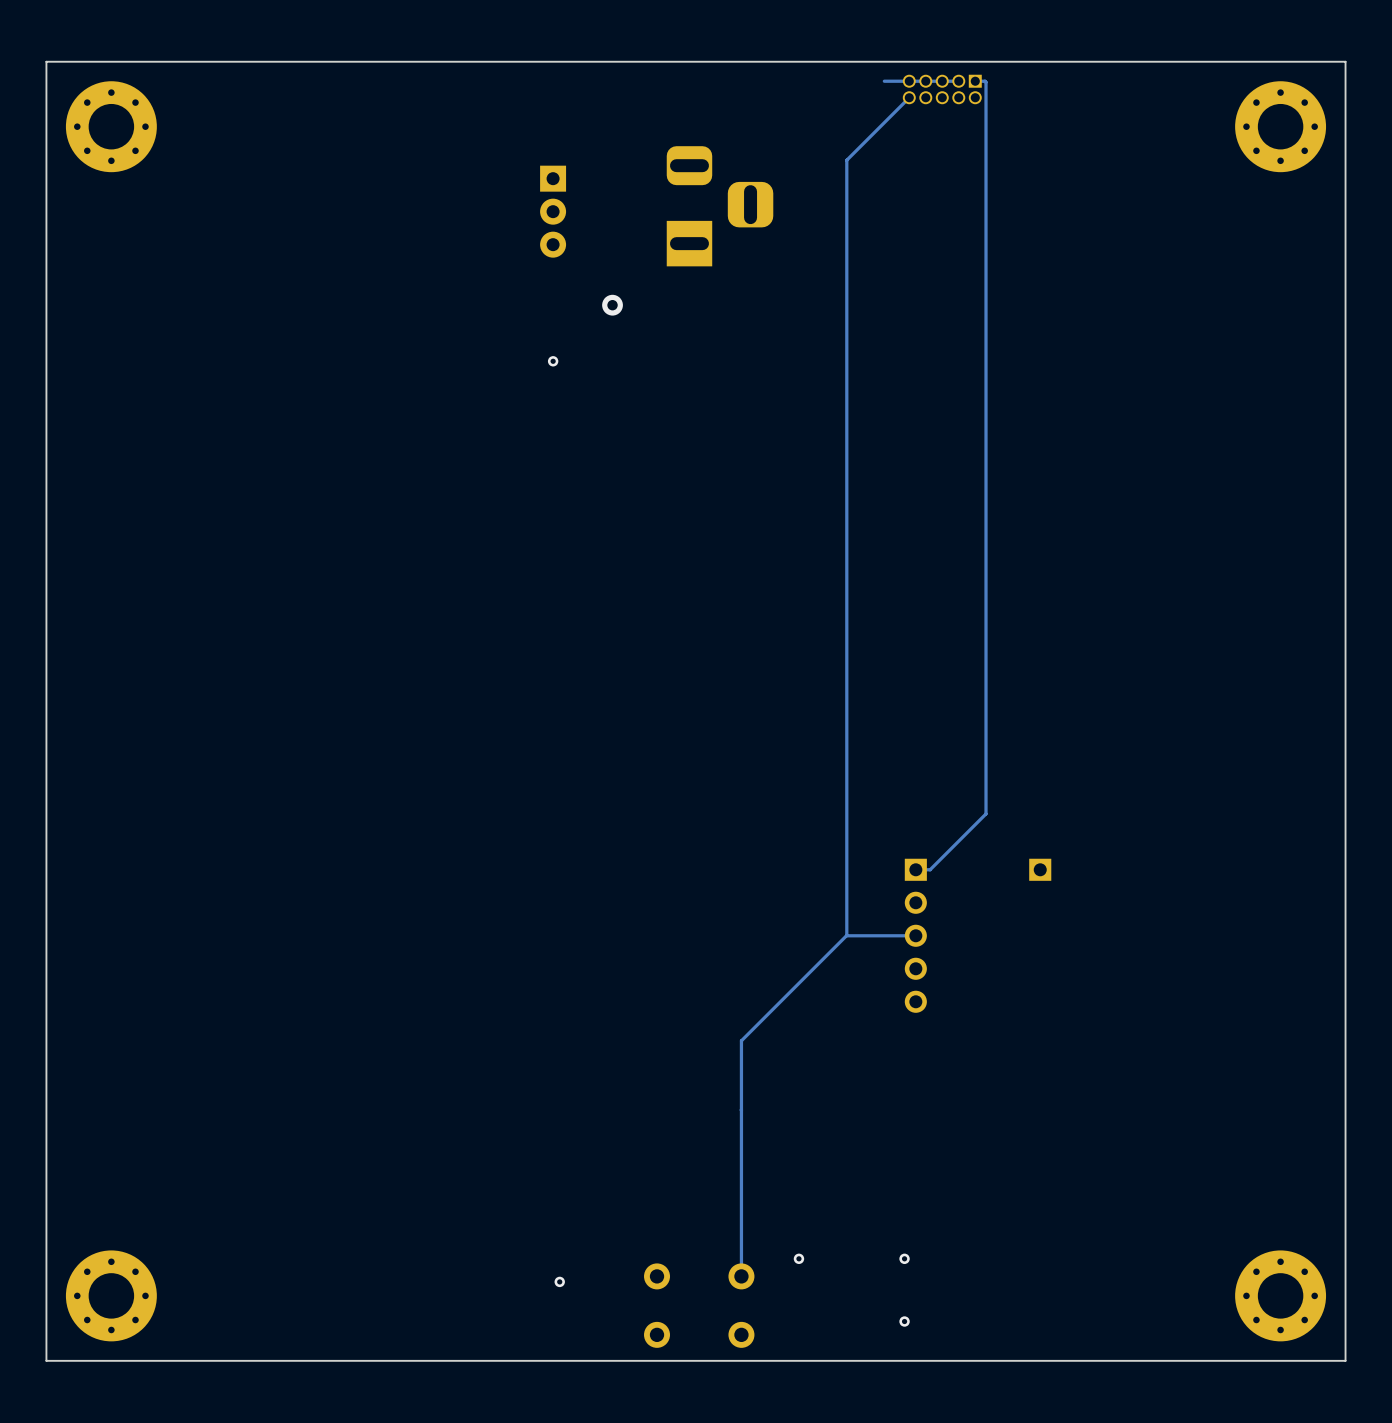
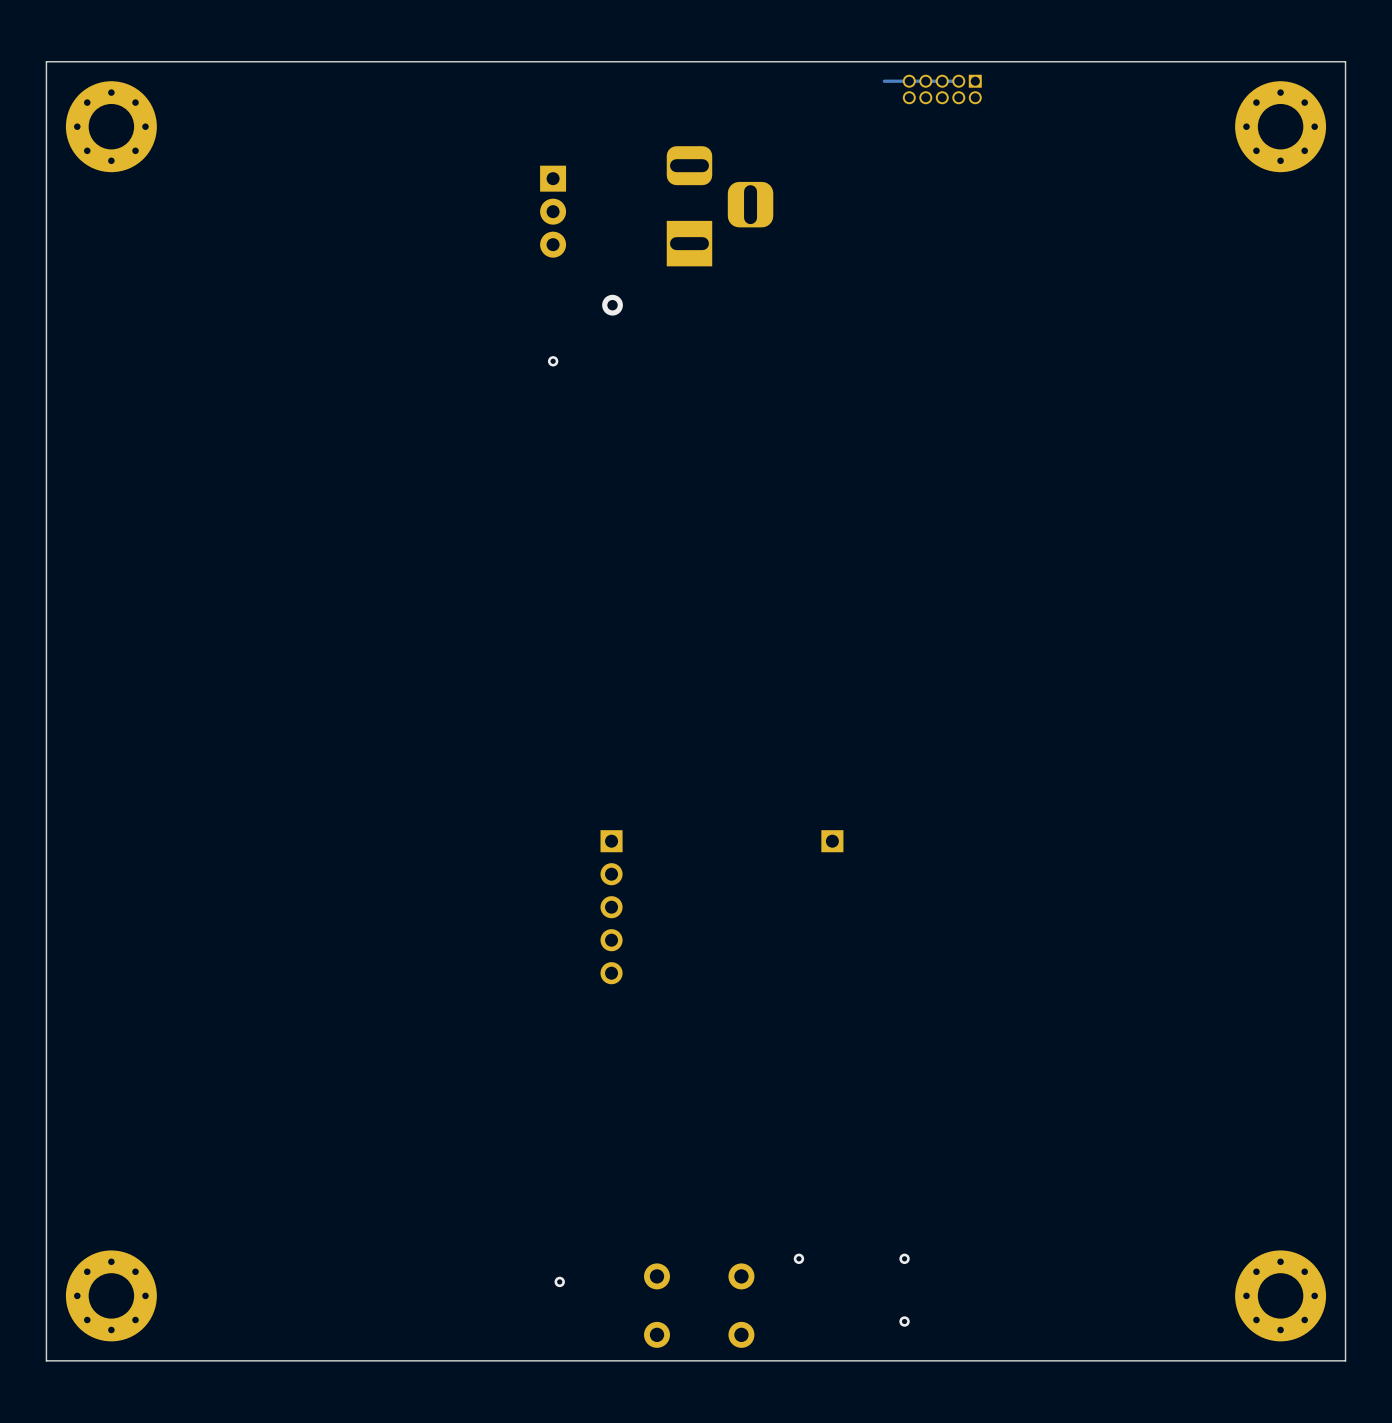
track: (975, 81) (986, 82) (986, 813) (930, 869) (915, 869) -> none
track: (909, 97) (846, 160) (846, 935) -> none
part position: (1040, 869) -> (832, 841)
track: (915, 935) (846, 935) (741, 1040) (741, 1276) -> none
part position: (915, 935) -> (611, 907)

